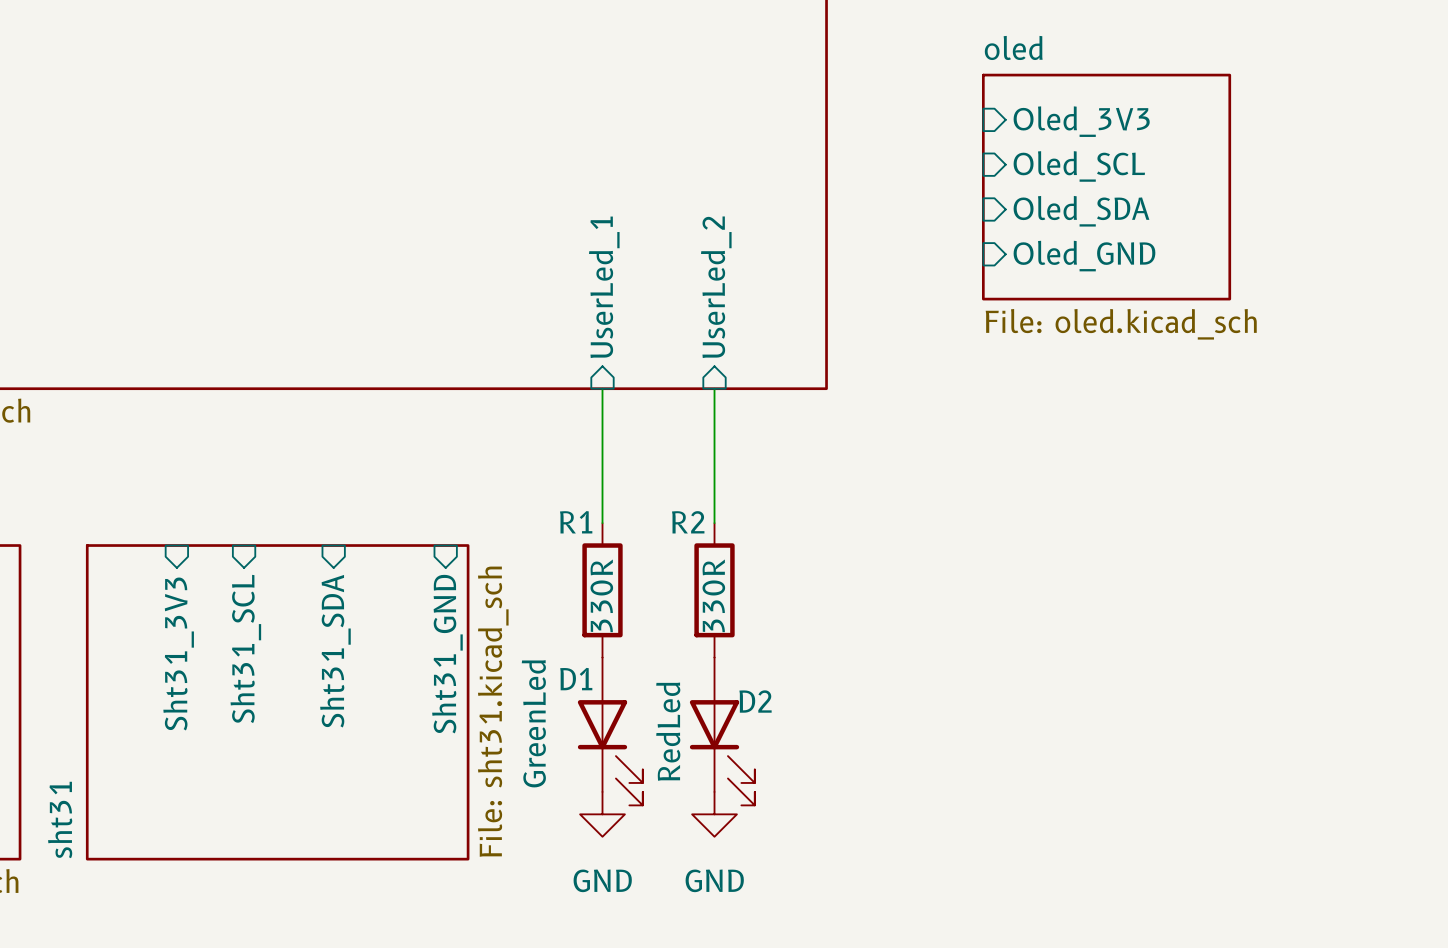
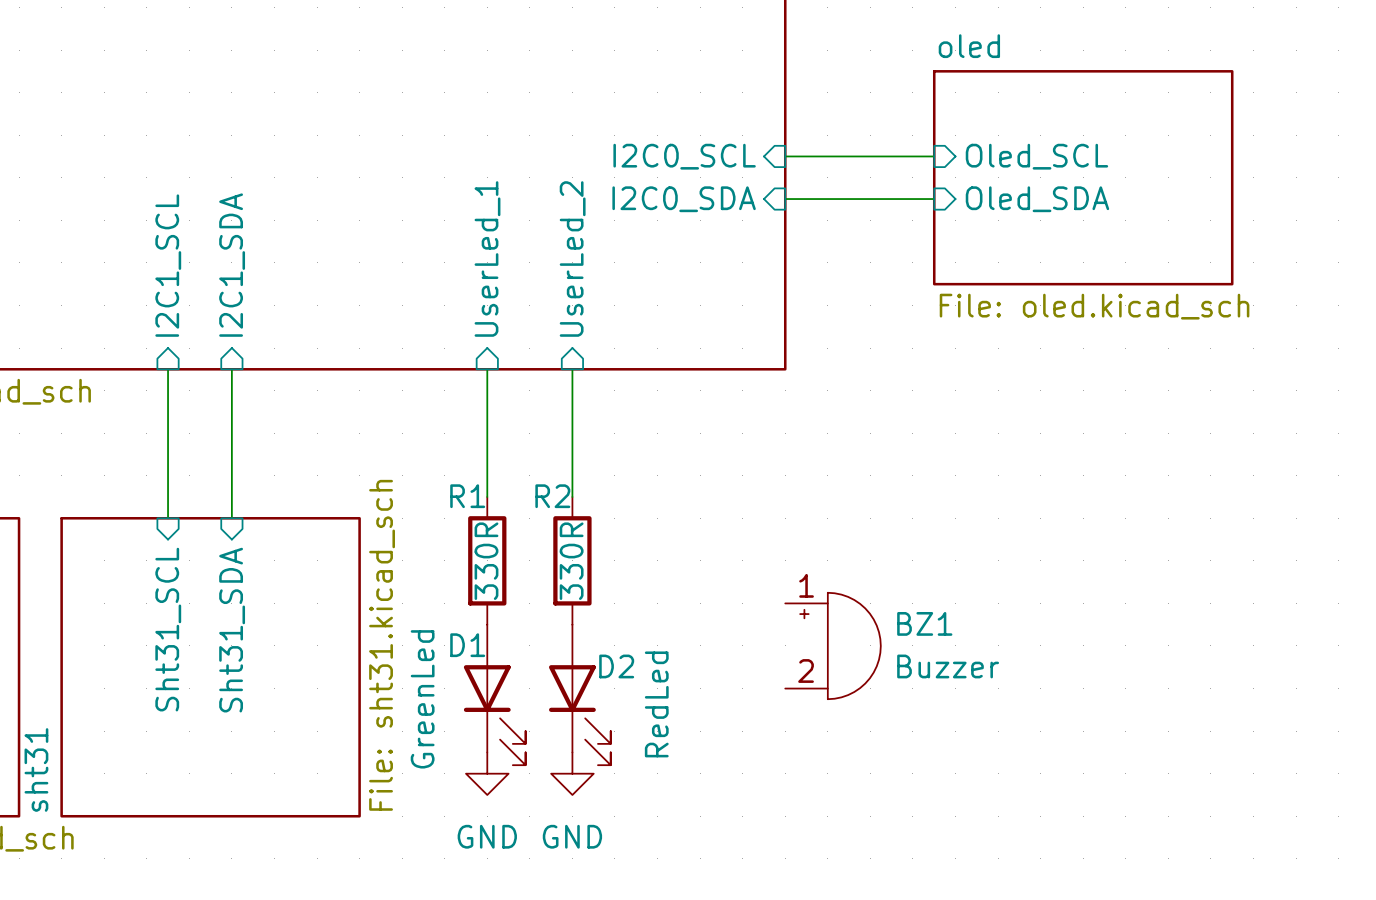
sheet pin: Oled_3V3 (1081, 121) -> none
wire: none -> (785, 156) (934, 156)
sheet pin: none -> I2C0_SCL (684, 156)
sheet oled: File: oled.kicad_sch (1106, 187) -> none
sheet oled: none -> File: oled.kicad_sch (1083, 177)
wire: none -> (785, 199) (934, 199)
sheet pin: none -> I2C0_SDA (684, 199)
sheet pin: Oled_GND (1084, 256) -> none
sheet pin: none -> UserLed_1 (487, 259)
sheet pin: UserLed_1 (604, 287) -> UserLed_2 (572, 259)
sheet pin: UserLed_2 (716, 287) -> none
sheet pin: none -> I2C1_SDA (232, 265)
sheet pin: none -> I2C1_SCL (168, 265)
wire: none -> (168, 369) (168, 518)
wire: none -> (231, 369) (231, 518)
wire: (714, 388) (714, 523) -> (487, 369) (487, 497)
R1 name: R1 (576, 522) -> R2 (552, 496)
sheet sht31 shape: [85, 544, 470, 861] -> [60, 517, 361, 818]
R1: none -> 330R (487, 560)
R2: 330R (714, 590) -> none
sheet pin: Sht31_SCL (245, 648) -> Sht31_SDA (232, 630)
sheet pin: Sht31_SDA (335, 651) -> none
sheet pin: Sht31_3V3 (178, 653) -> Sht31_SCL (168, 629)
sheet pin: Sht31_GND (447, 654) -> none
D1 name: D1 (576, 679) -> D2 (616, 666)
BZ1: none -> Buzzer (833, 645)
D1 value: GreenLed (533, 723) -> RedLed (656, 704)
D1: none -> GreenLed (494, 694)
D2: RedLed (722, 731) -> none
power symbol position: GND (714, 814) -> GND (487, 773)

